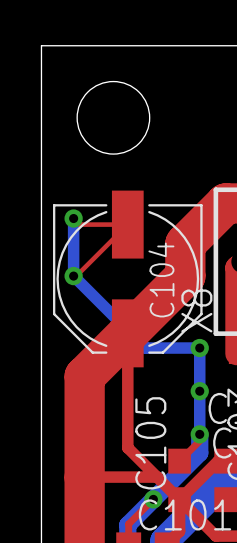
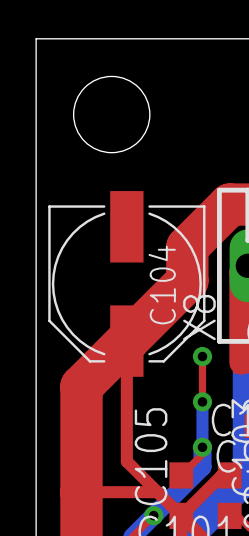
top track: (73, 218) (79, 224) (127, 224) (76, 276) (73, 276) -> none
bottom track: (73, 218) (73, 276) (145, 348) (199, 348) (199, 391) -> none
via: (73, 218) -> none
via: (73, 276) -> none
top track: none -> (202, 356) (202, 401)

